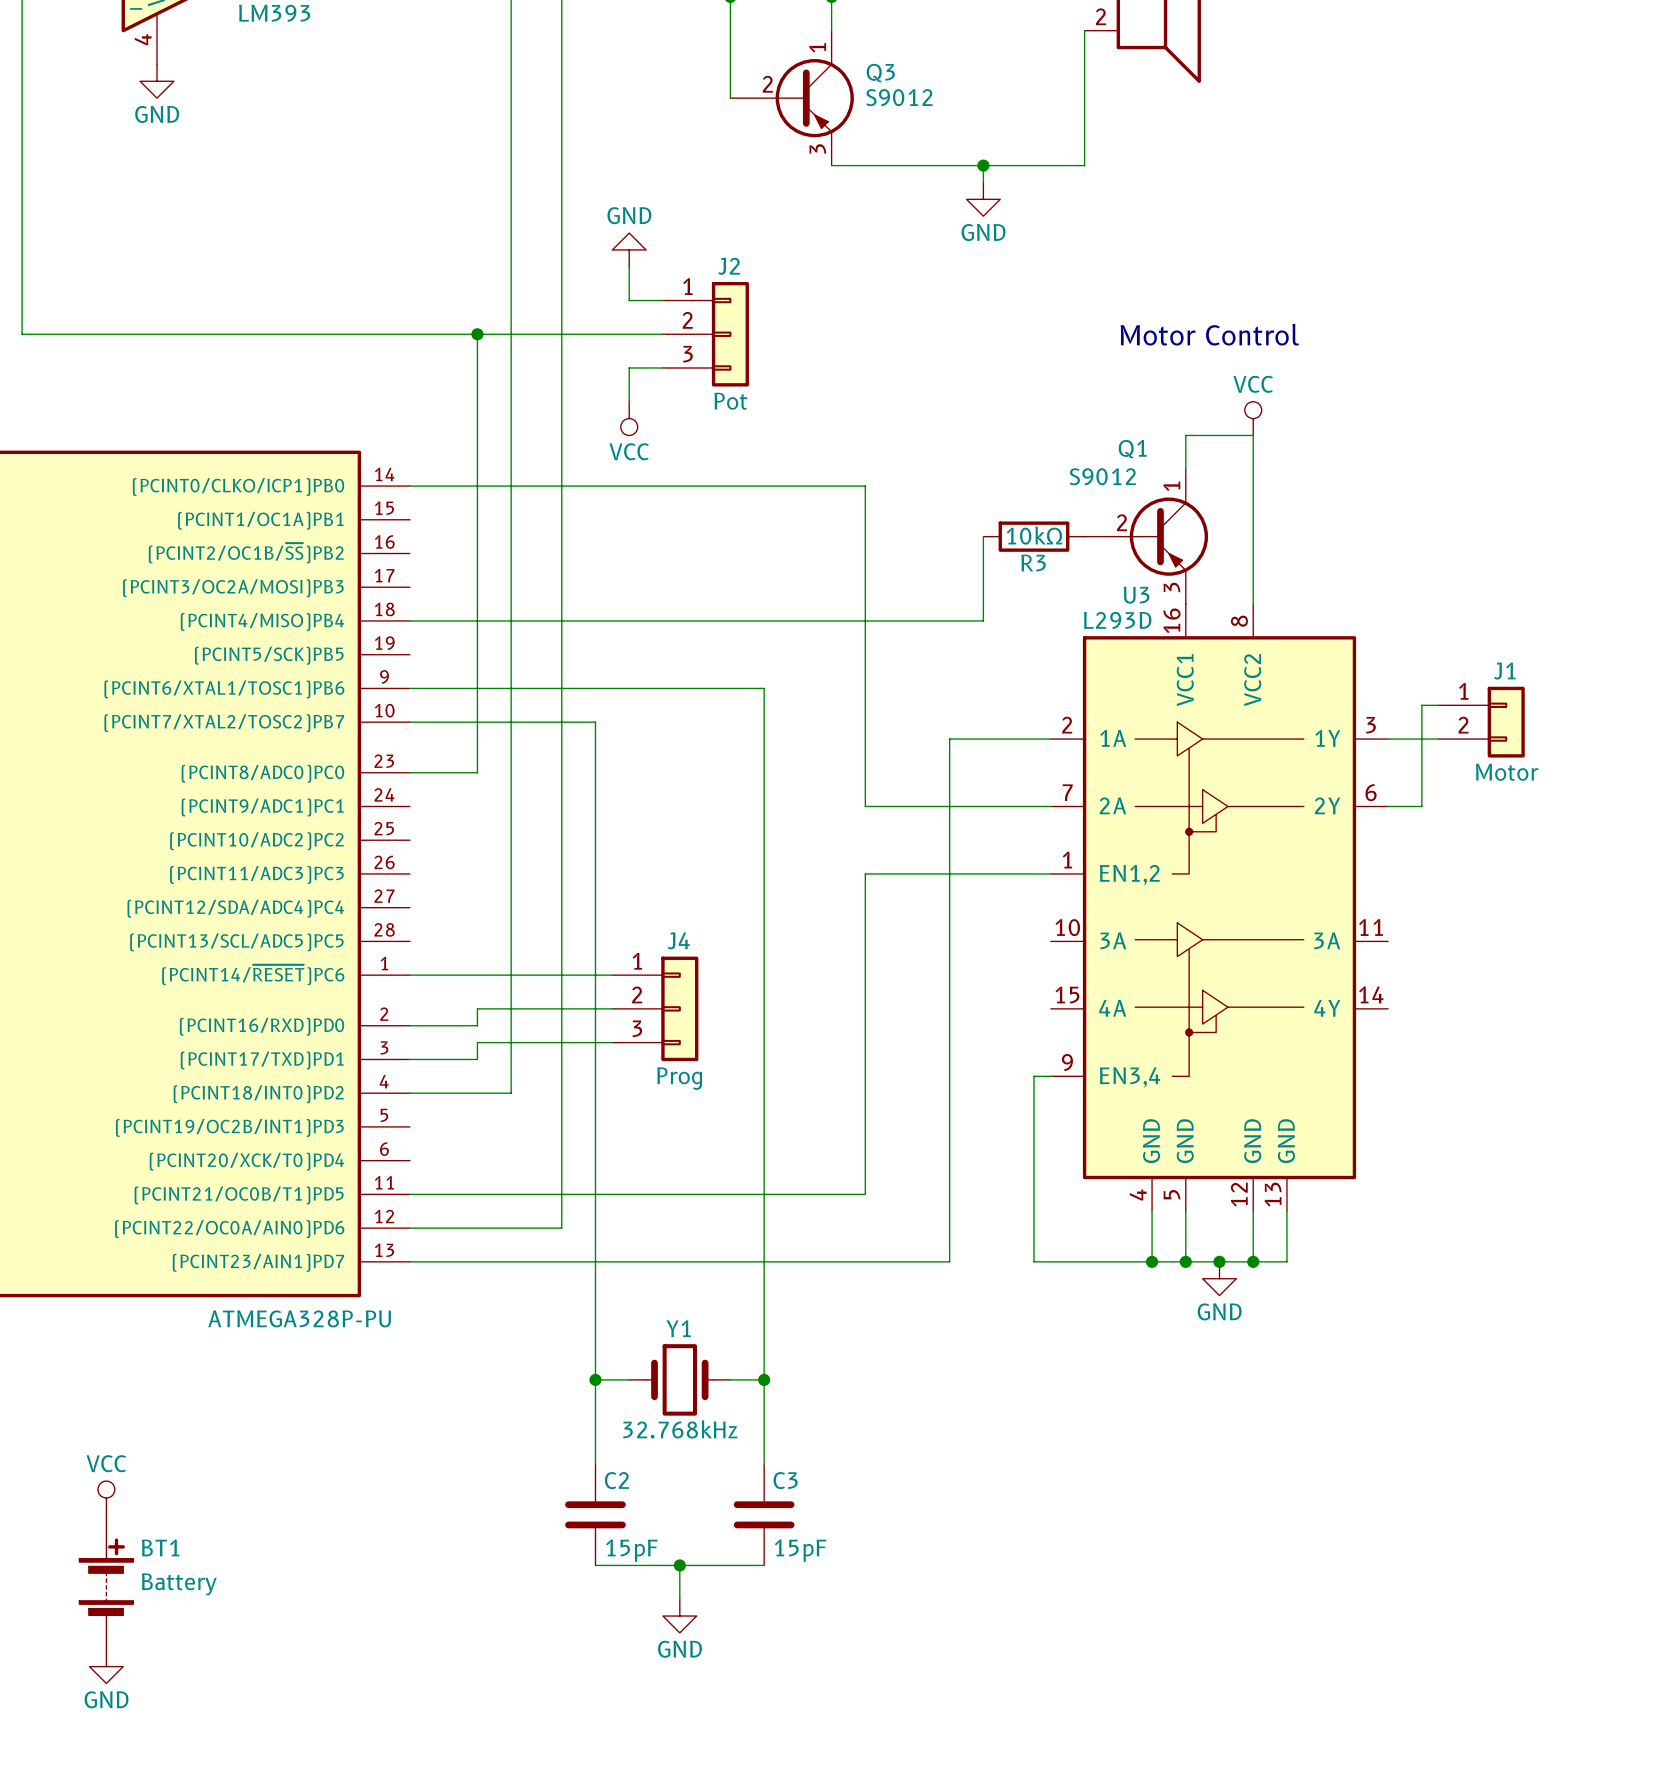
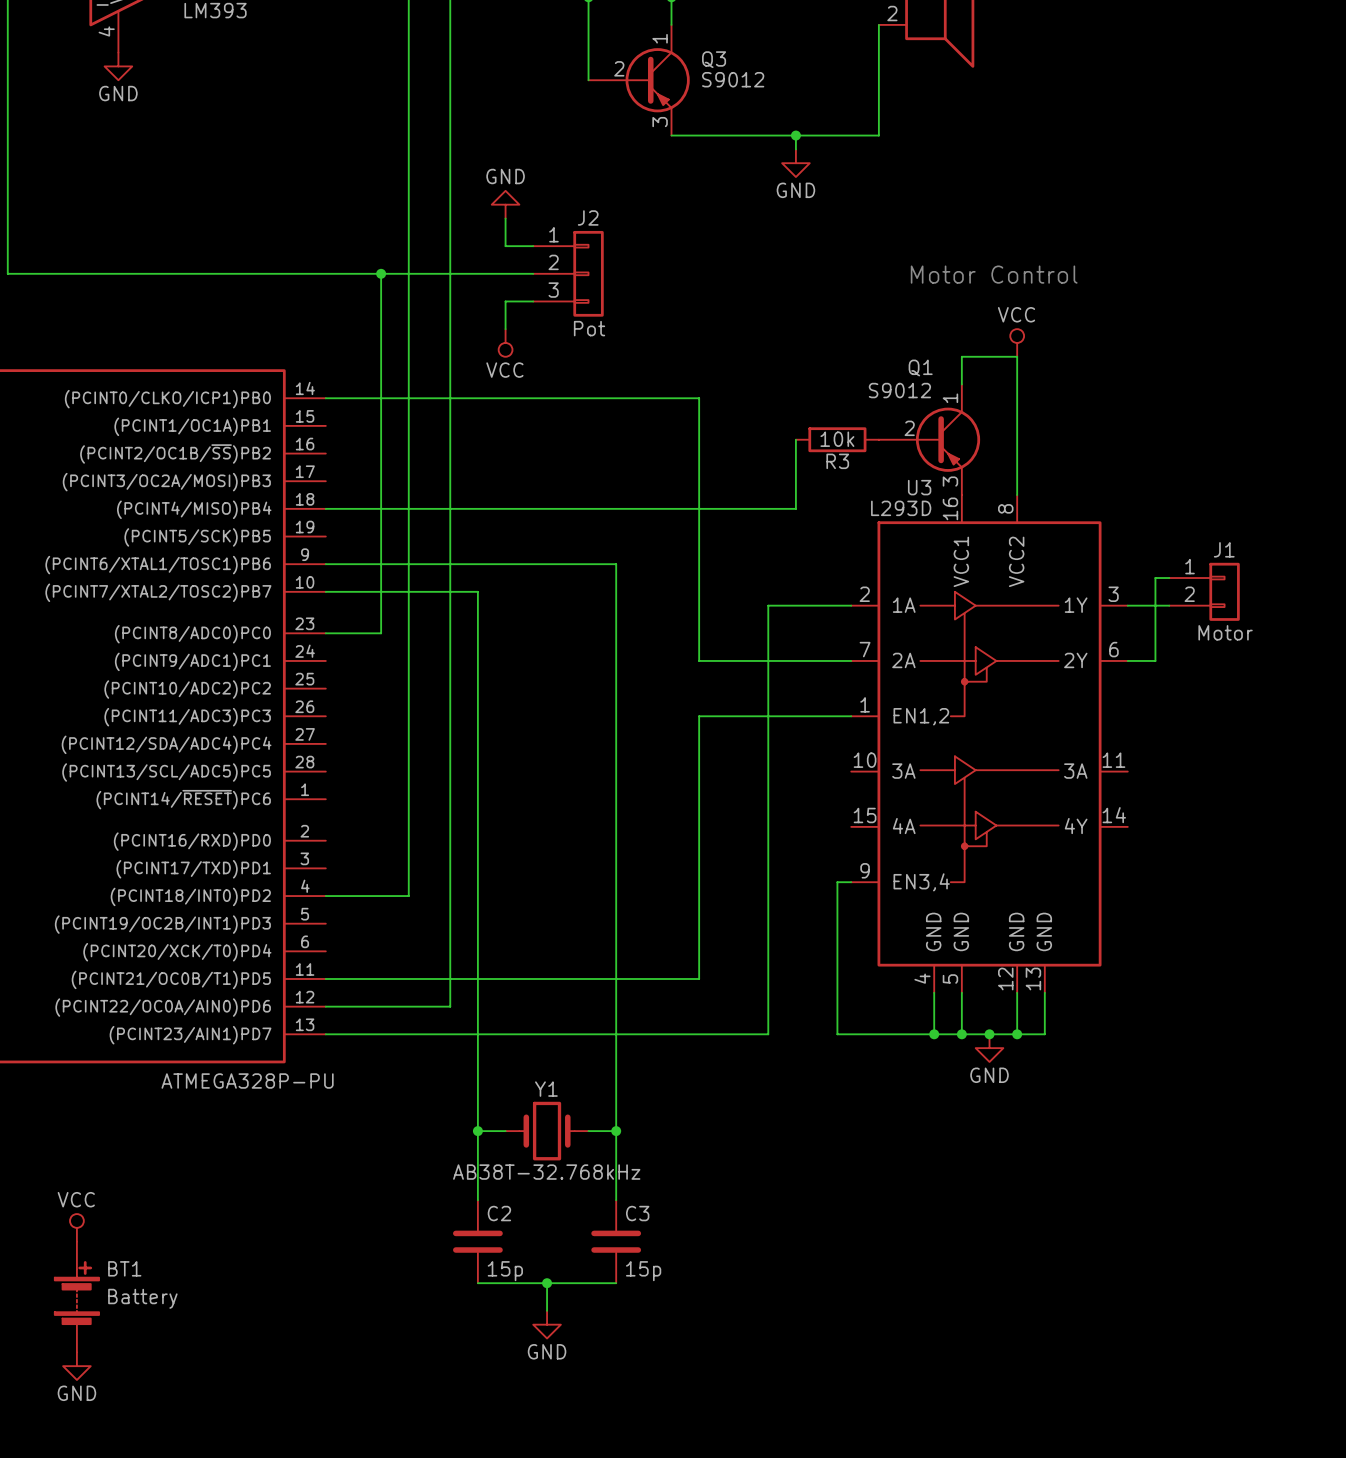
R3 value: 10kΩ (1034, 535) -> 10k (837, 439)
wire: (409, 975) (612, 975) -> none
wire: (612, 1008) (477, 1008) (477, 1025) (409, 1025) -> none
J4: Prog (655, 1008) -> none
wire: (612, 1042) (477, 1042) (477, 1059) (409, 1059) -> none
Y1 value: 32.768kHz (680, 1429) -> AB38T-32.768kHz (546, 1172)
C2 value: 15pF (631, 1550) -> 15p (505, 1271)
C3 value: 15pF (800, 1550) -> 15p (643, 1271)

